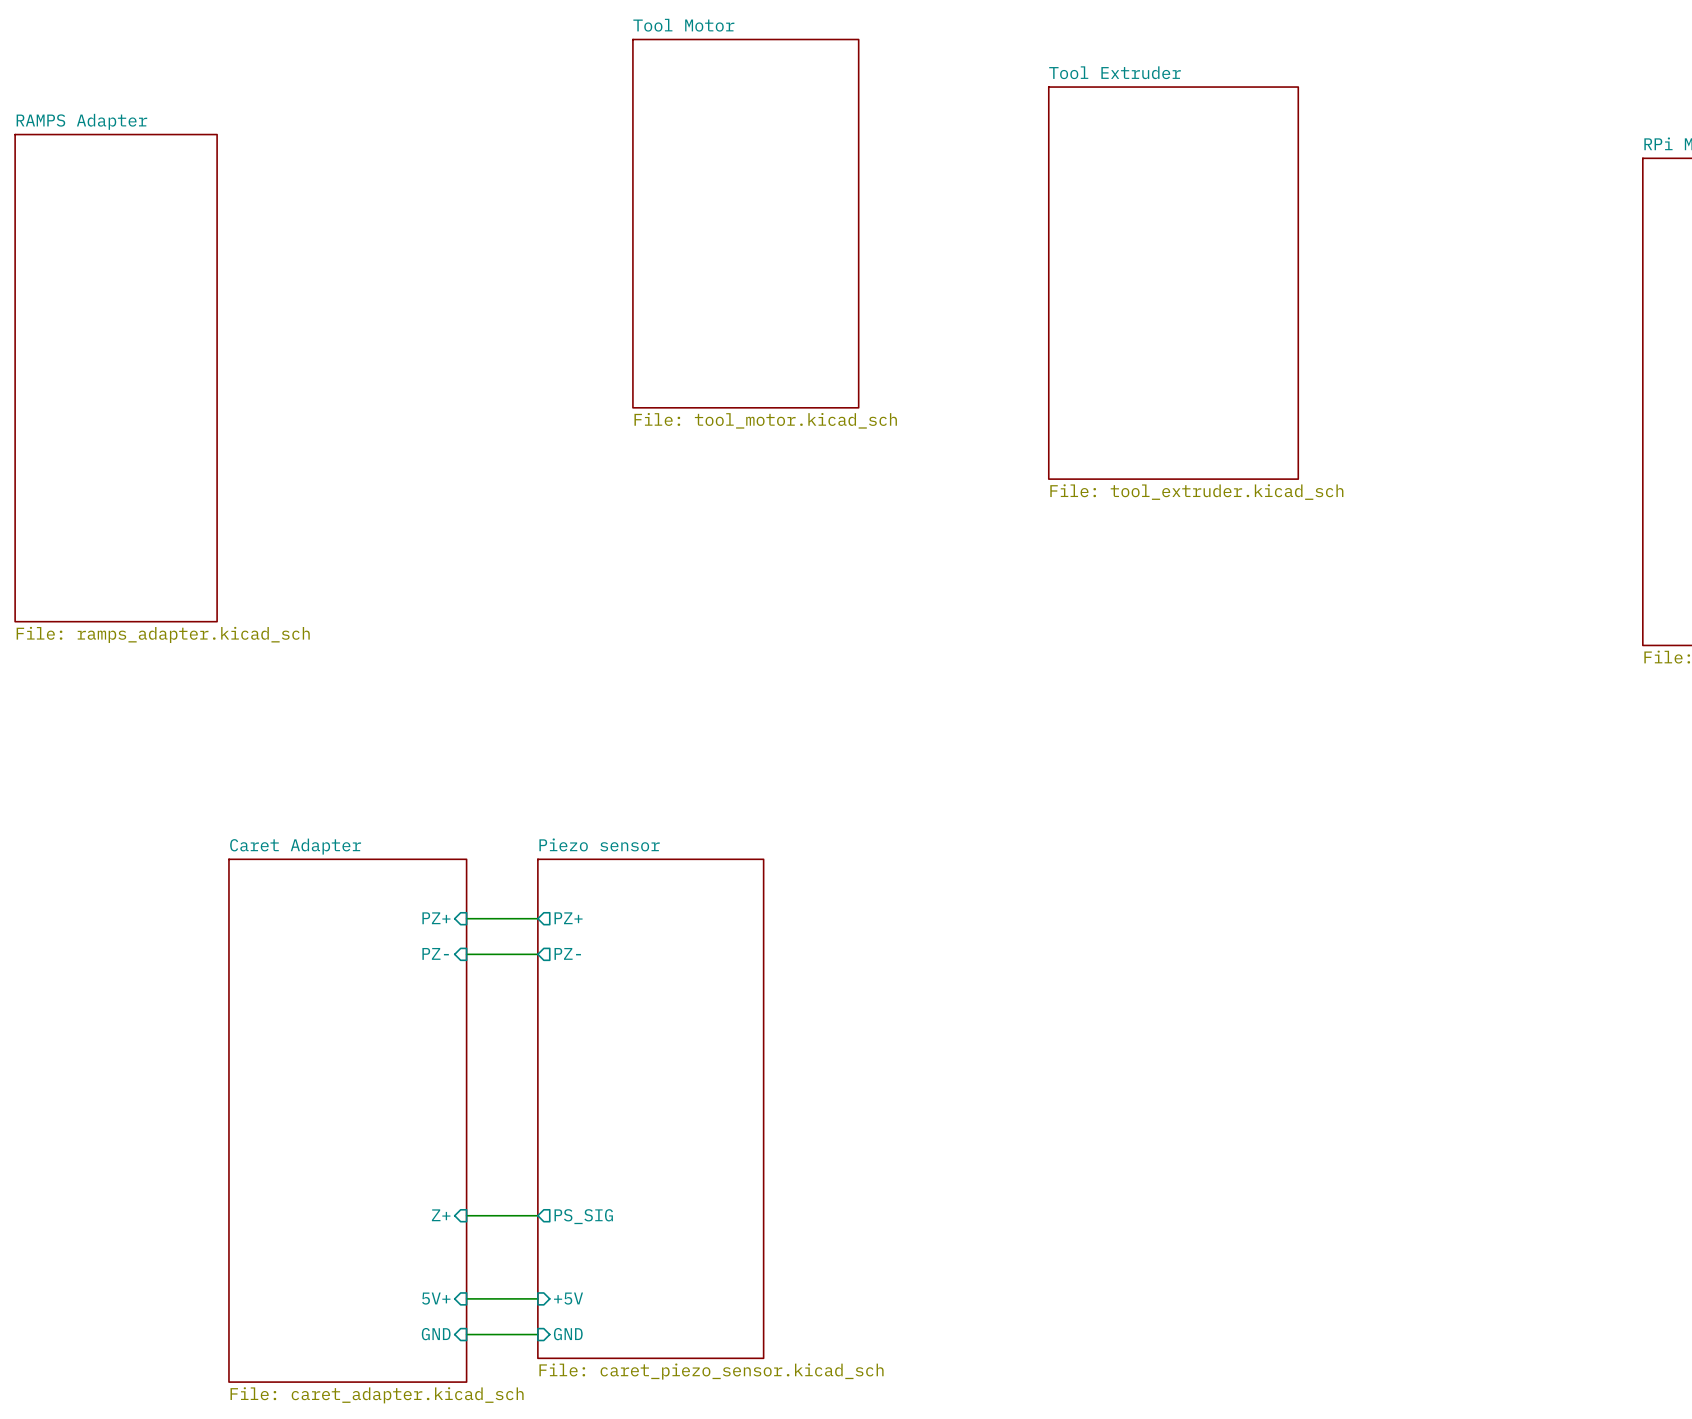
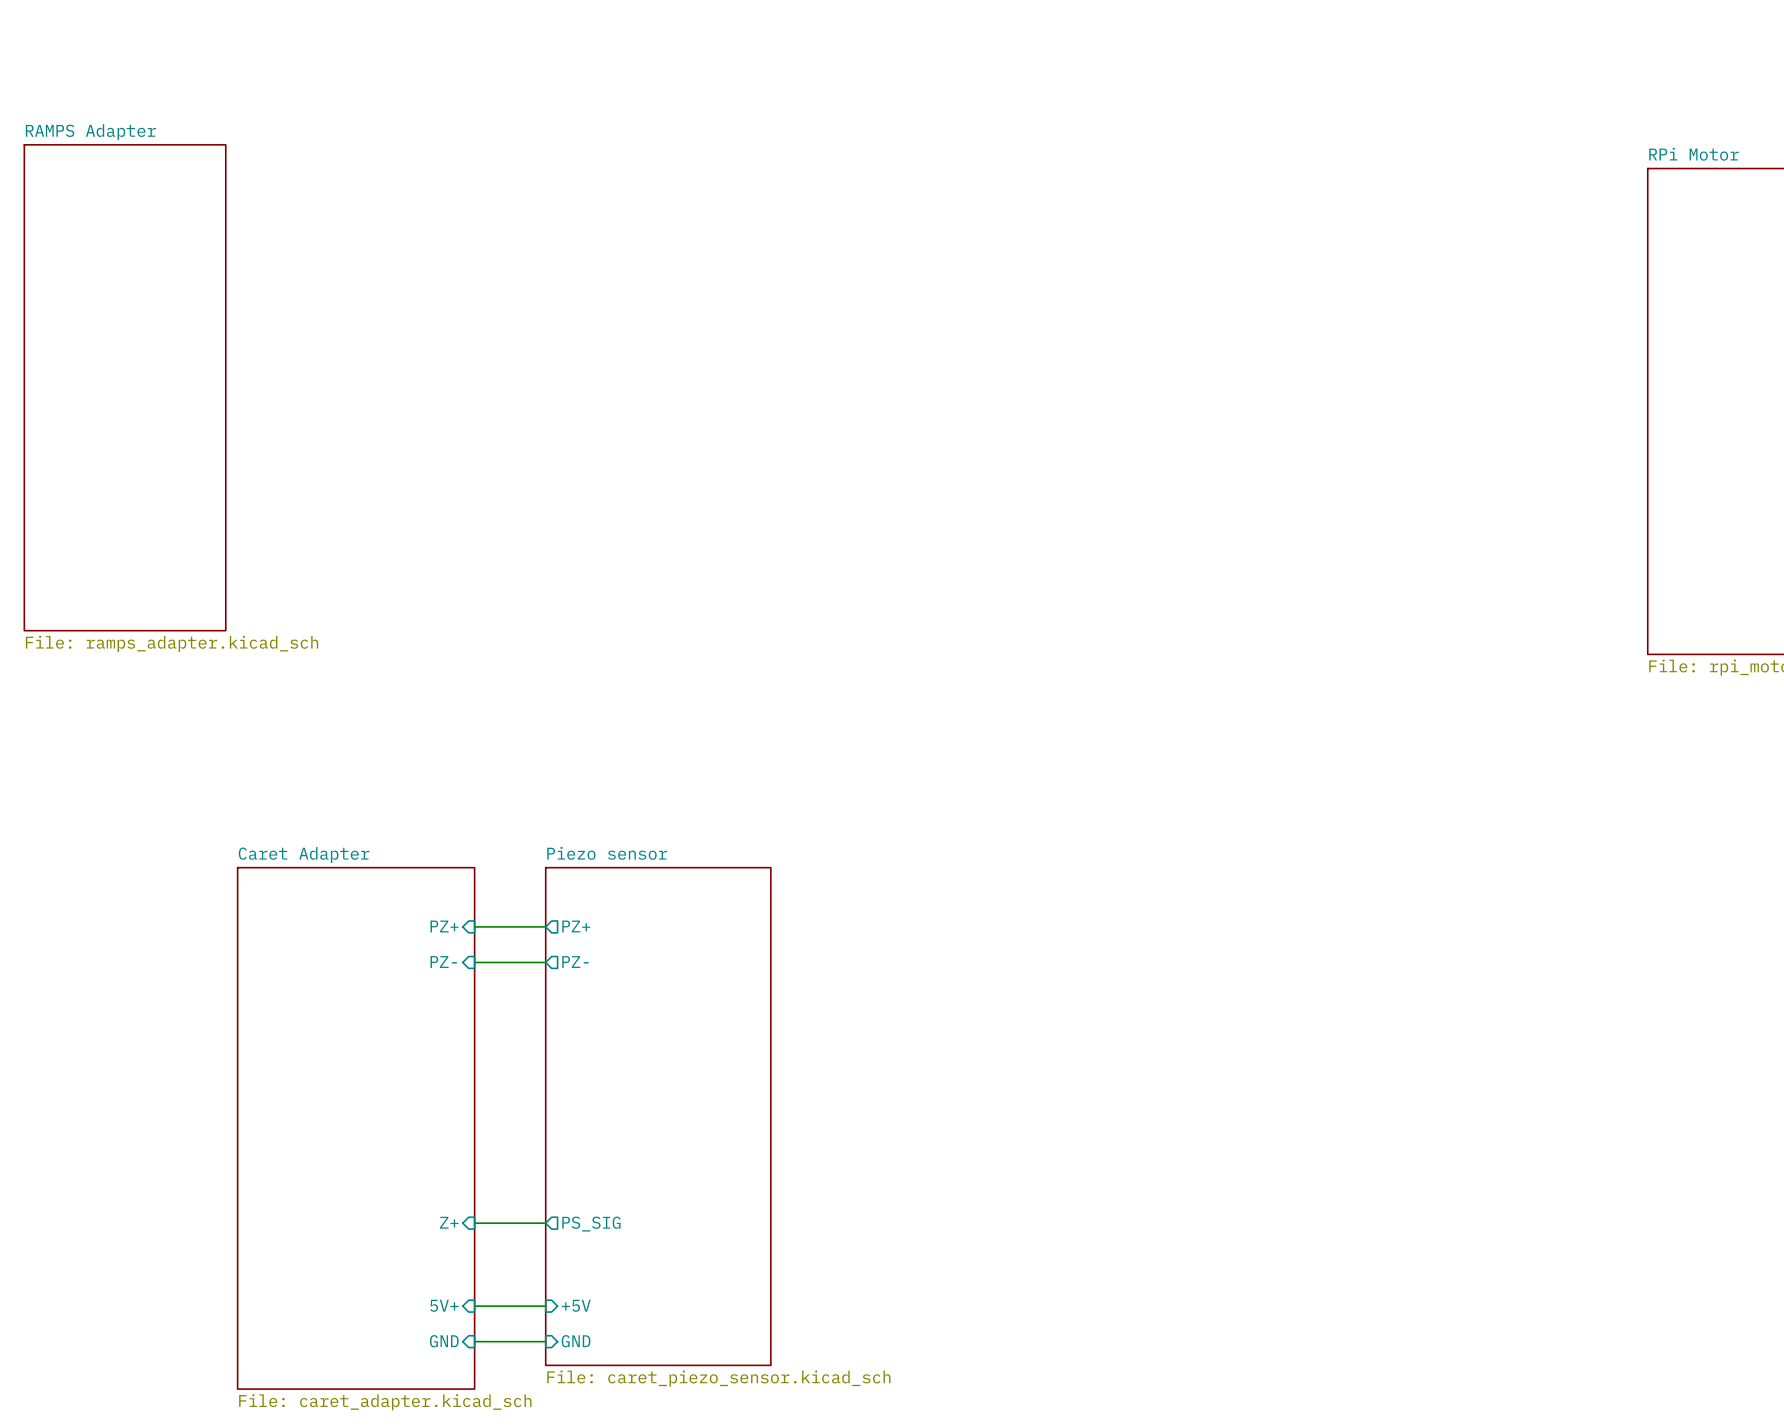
sheet Tool Motor: File: tool_motor.kicad_sch (745, 223) -> none
sheet Tool Extruder: File: tool_extruder.kicad_sch (1173, 283) -> none

